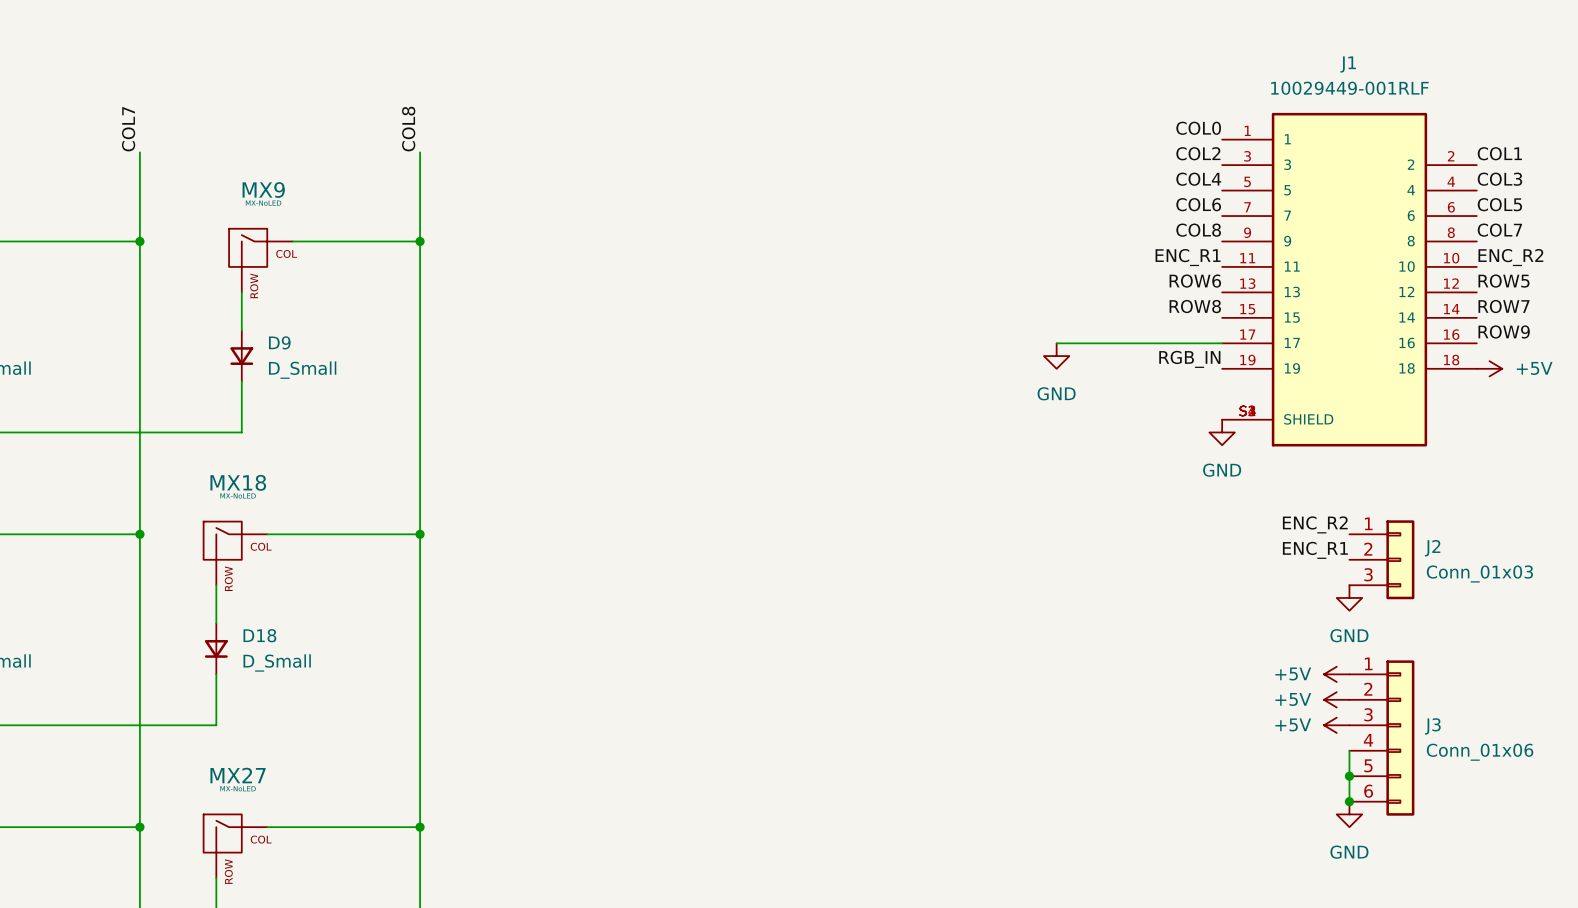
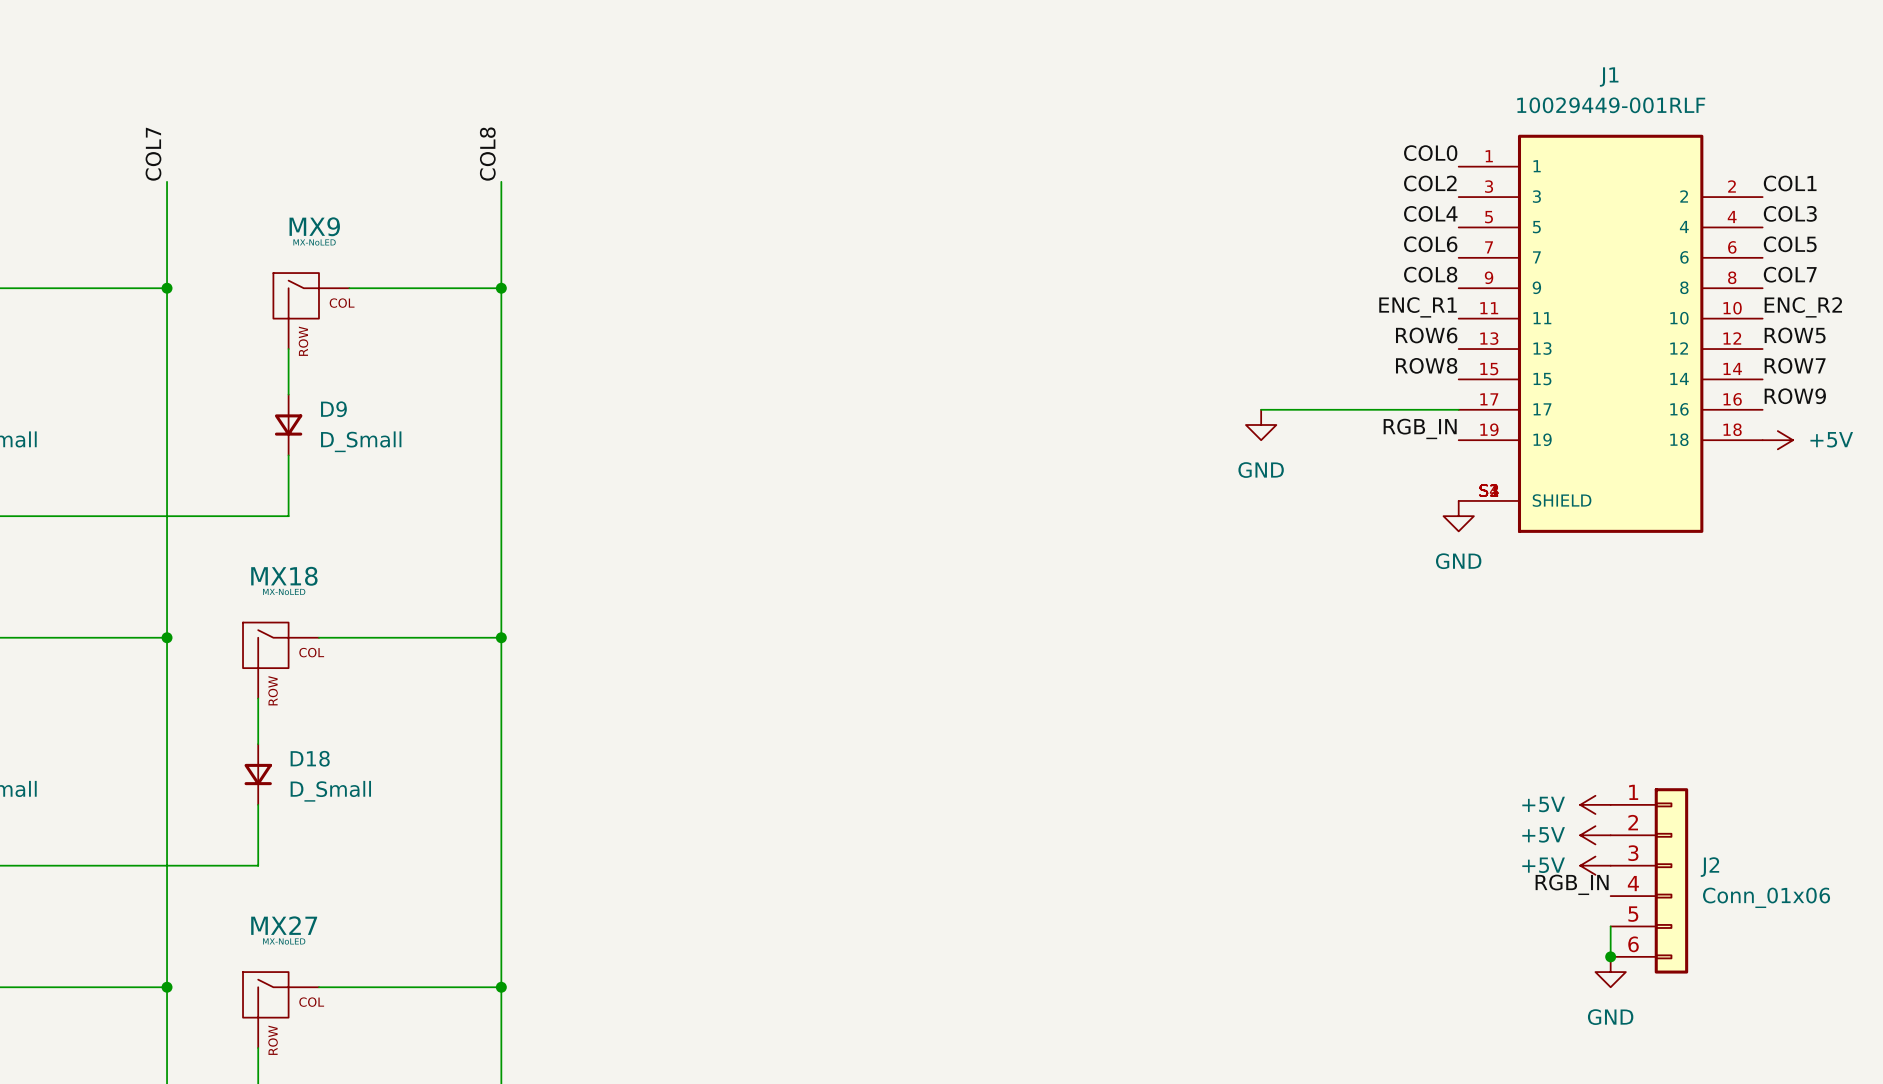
label: ENC_R2 (1315, 524) -> none
label: ENC_R1 (1315, 550) -> none
J2: Conn_01x03 (1381, 559) -> none
power symbol: GND (1349, 597) -> none
J3 name: J3 (1432, 726) -> J2 (1709, 867)
label: none -> RGB_IN (1572, 884)
wire: (1349, 750) (1349, 776) -> none
junction: (1349, 776) -> none

